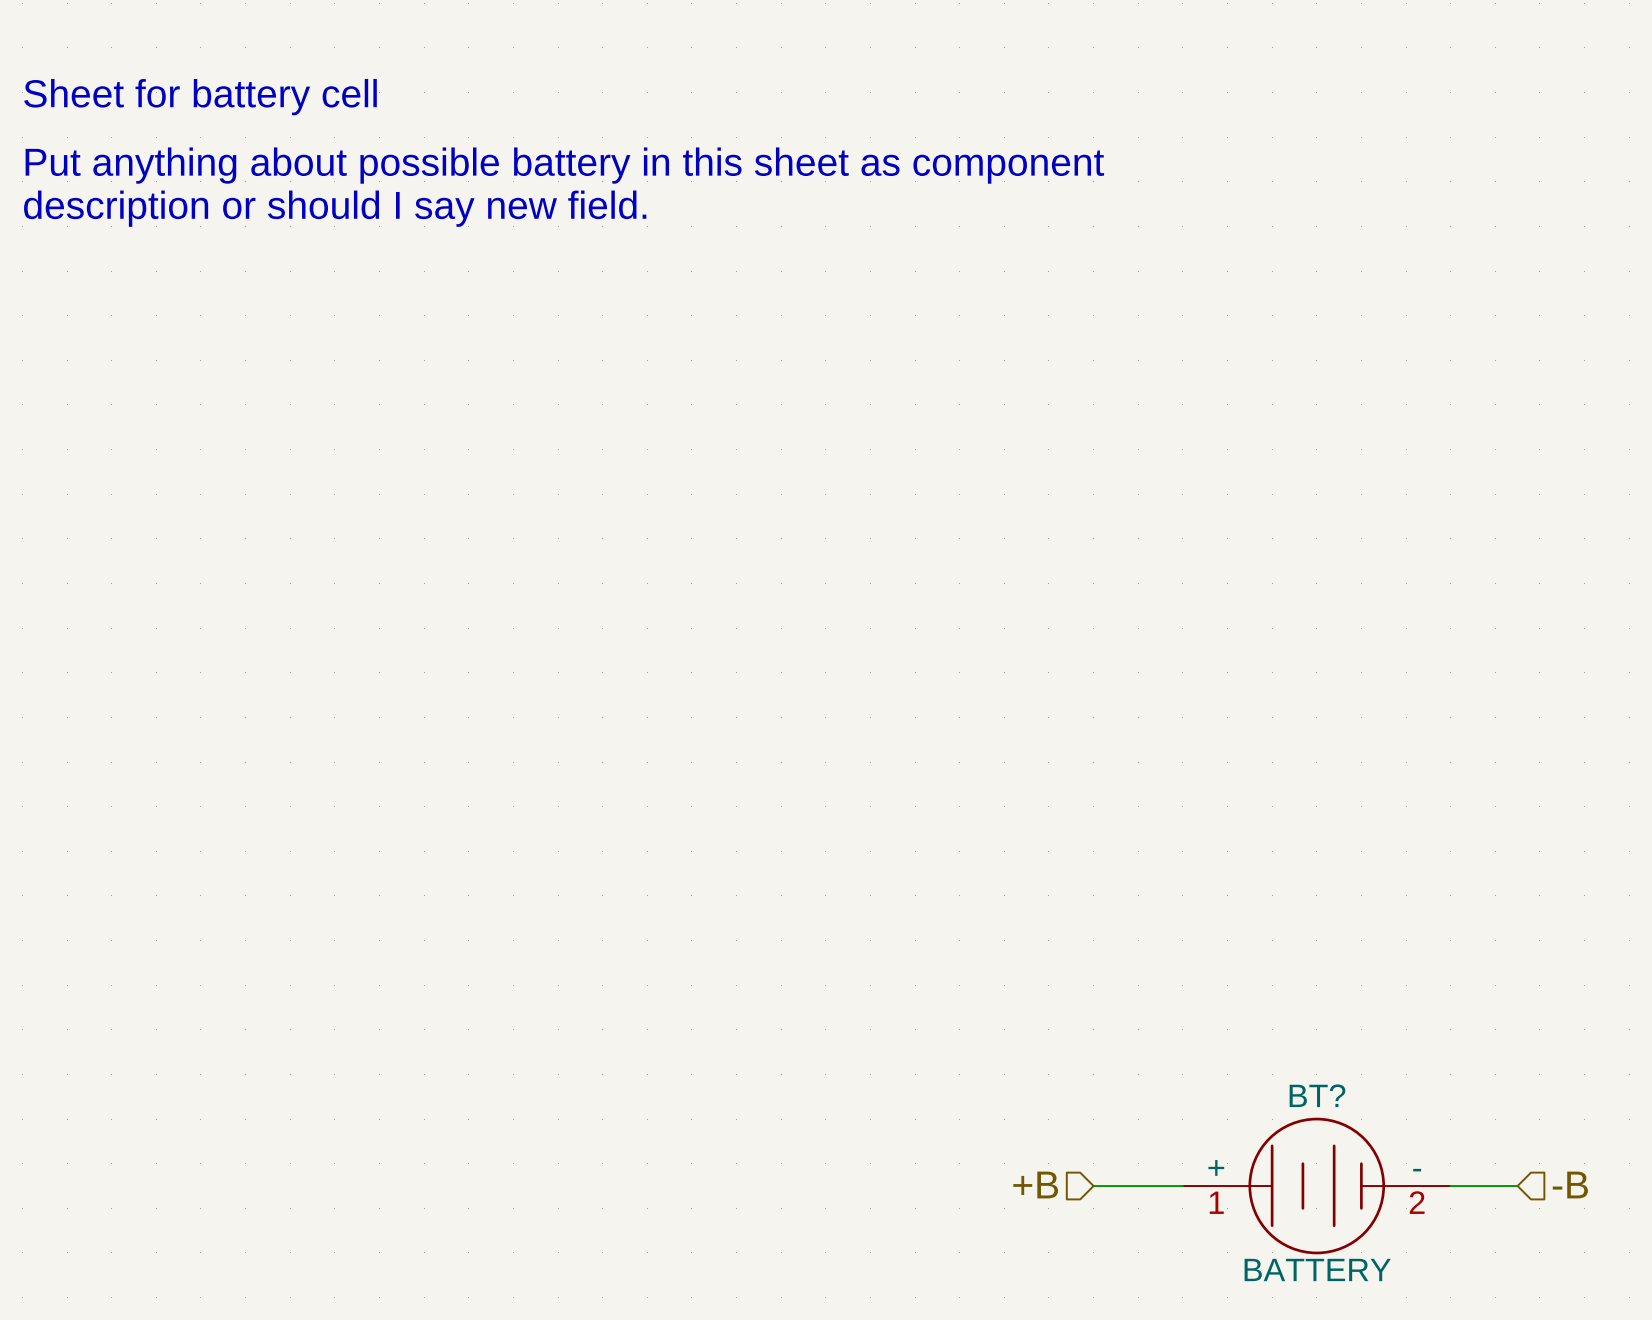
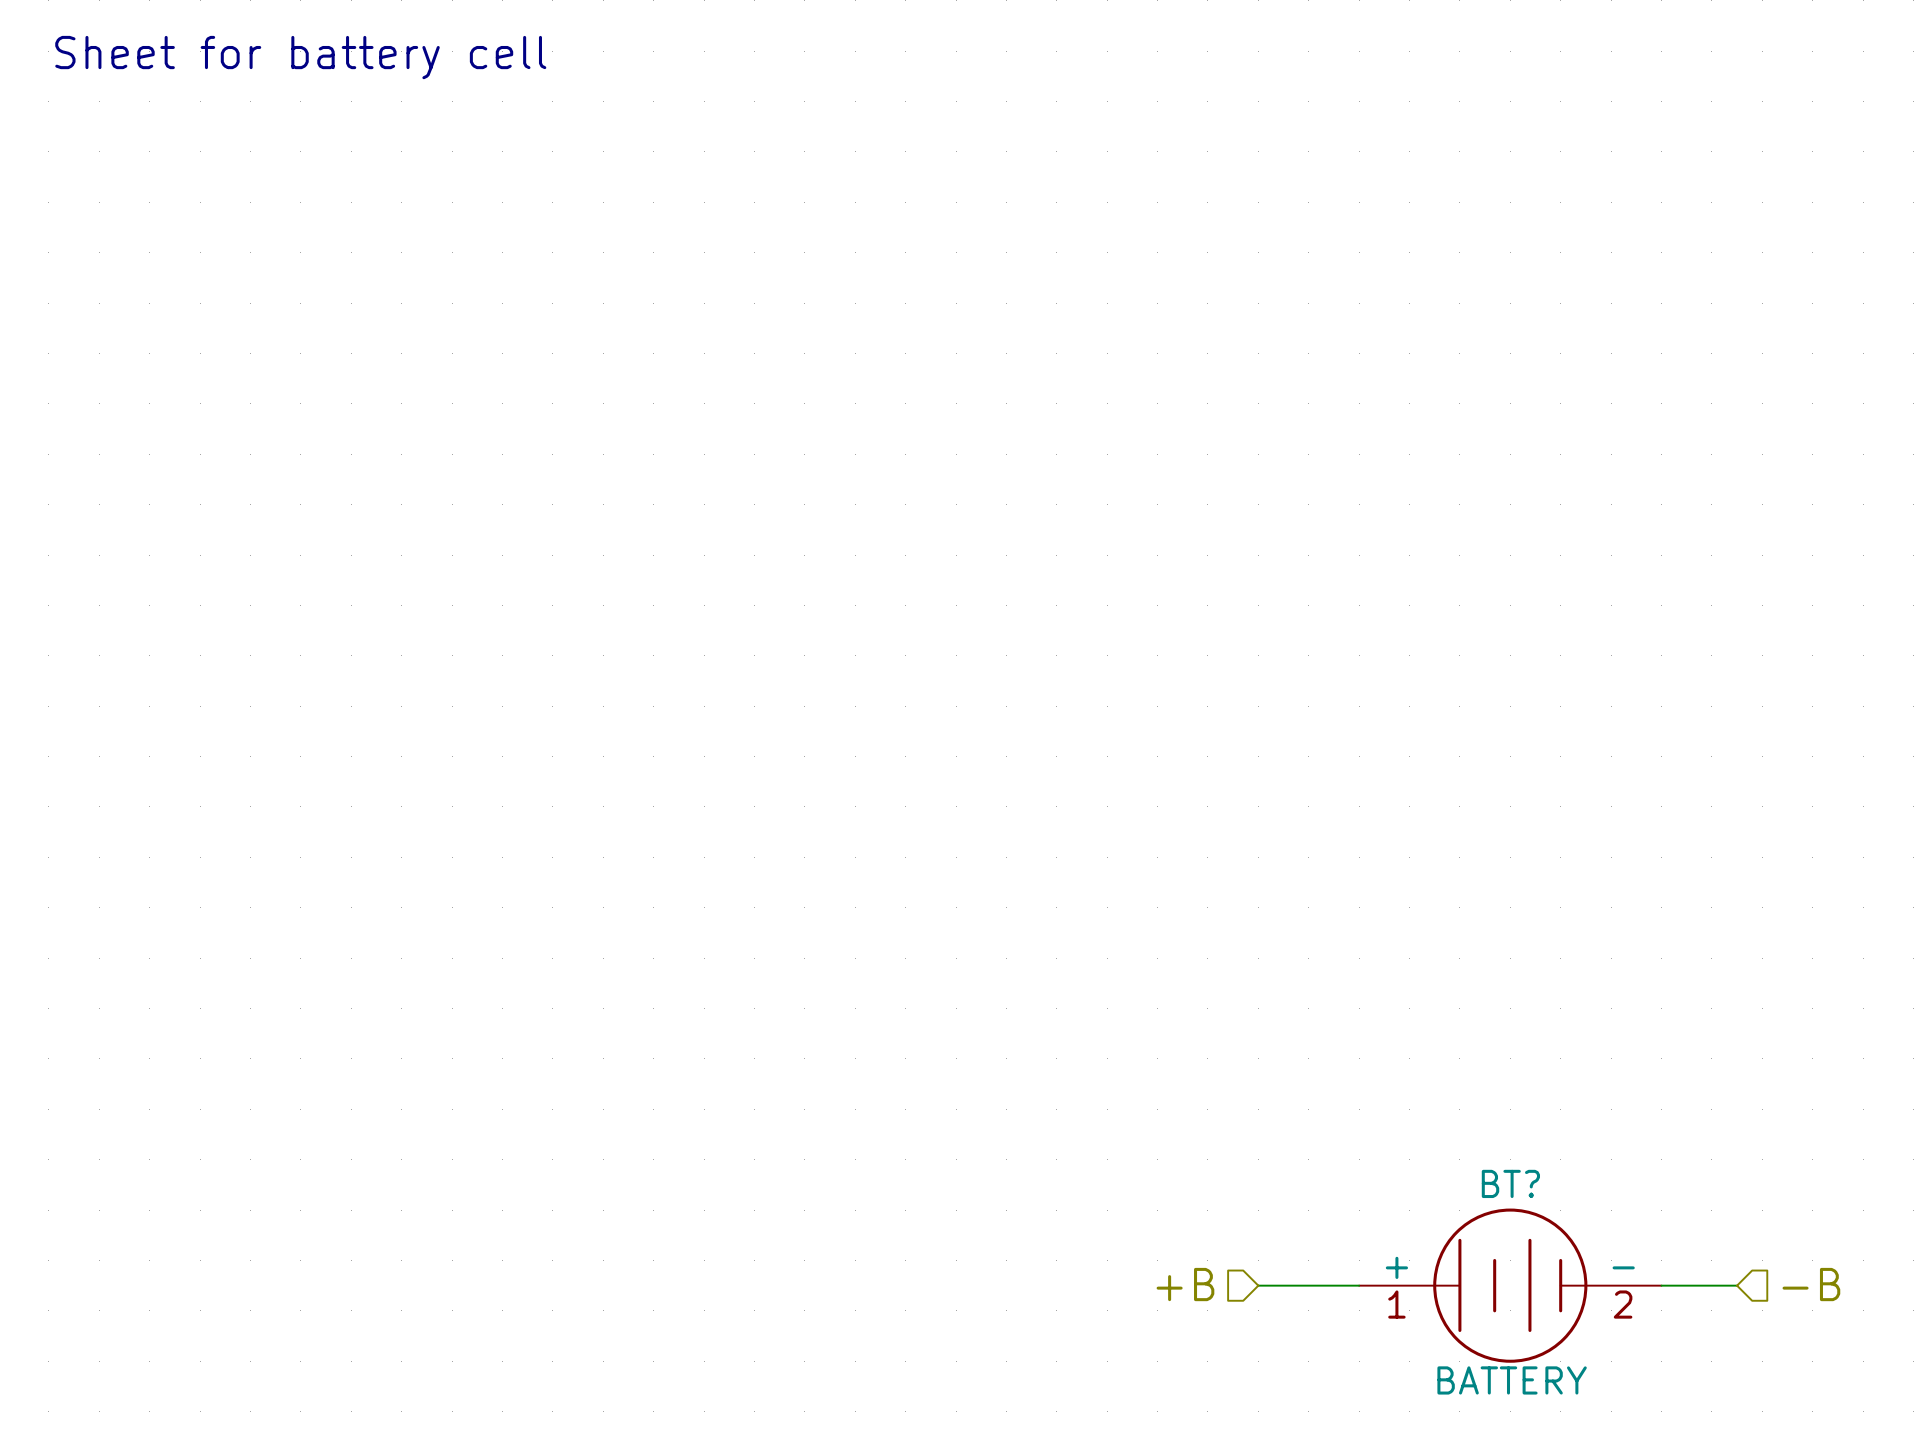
text: Put anything about possible battery in this sheet as component (564, 165) -> none
text: description or should I say new field. (335, 208) -> none

